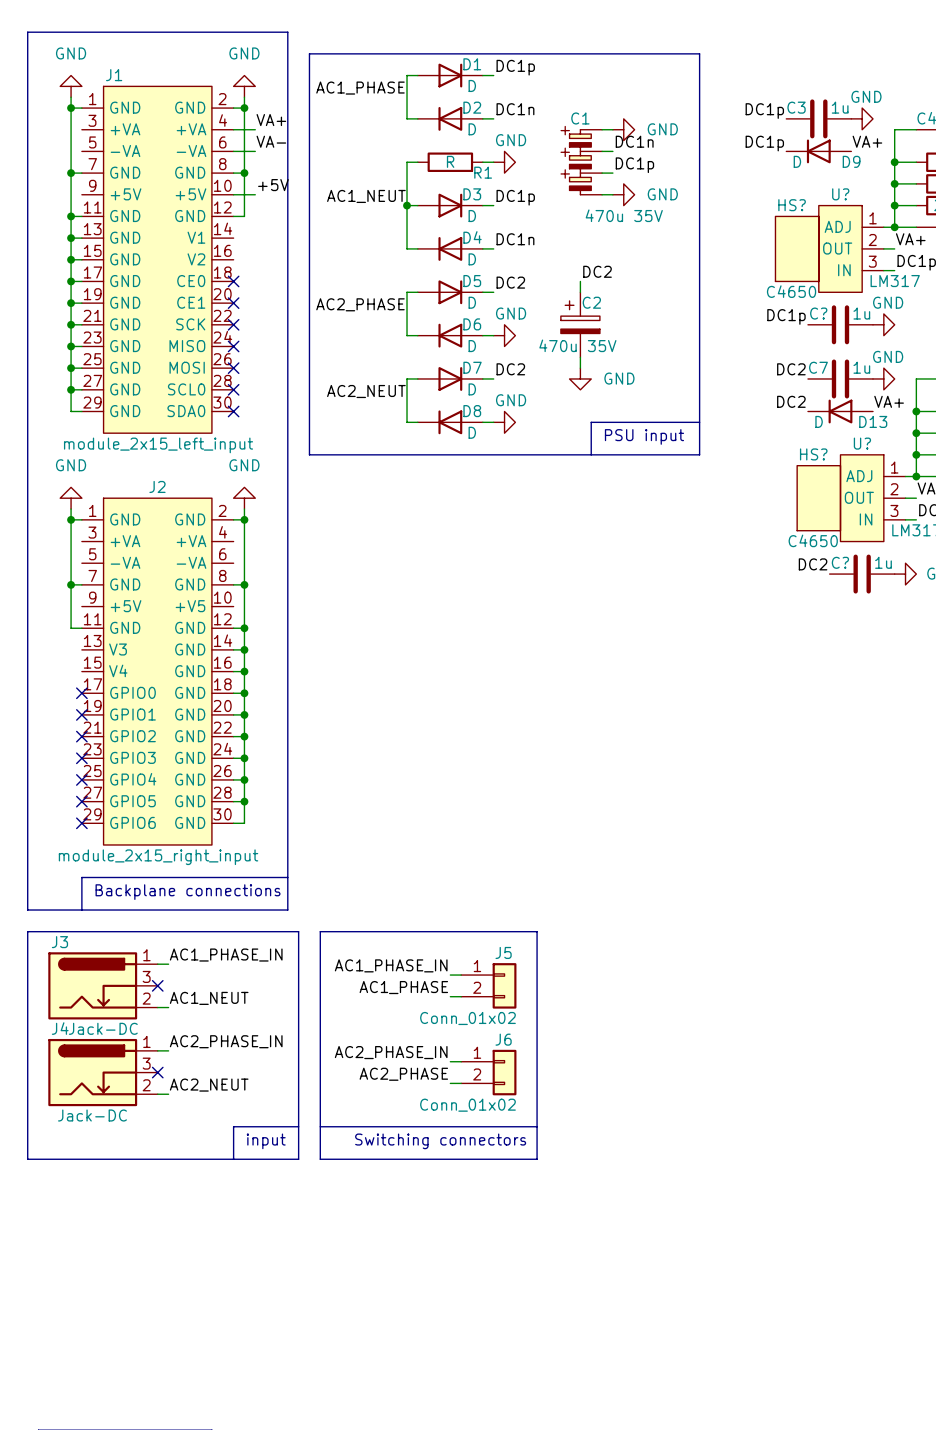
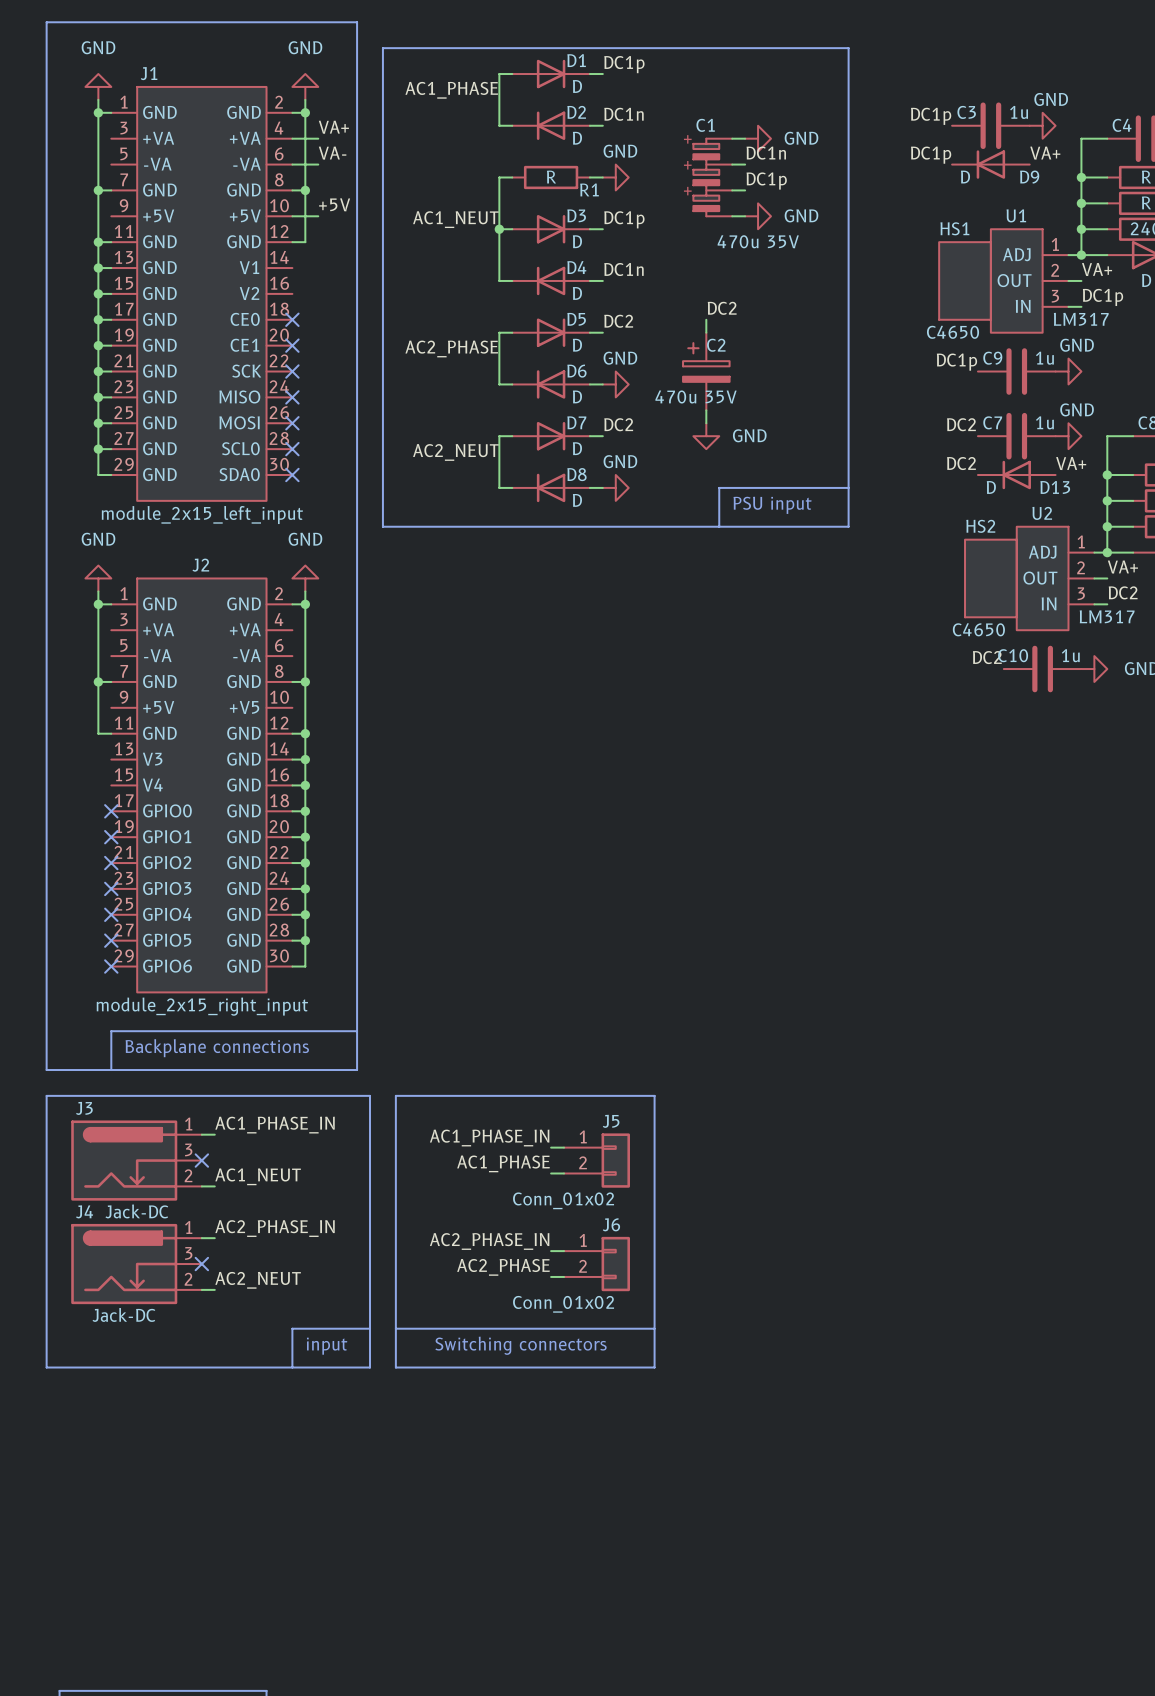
U? name: U? (840, 194) -> U1 (1016, 215)
HS? name: HS? (792, 205) -> HS1 (954, 228)
C? name: C? (818, 313) -> C9 (992, 358)
U? name: U? (862, 443) -> U2 (1042, 513)
HS? name: HS? (813, 454) -> HS2 (980, 526)
C? name: C? (840, 562) -> C10 (1013, 655)

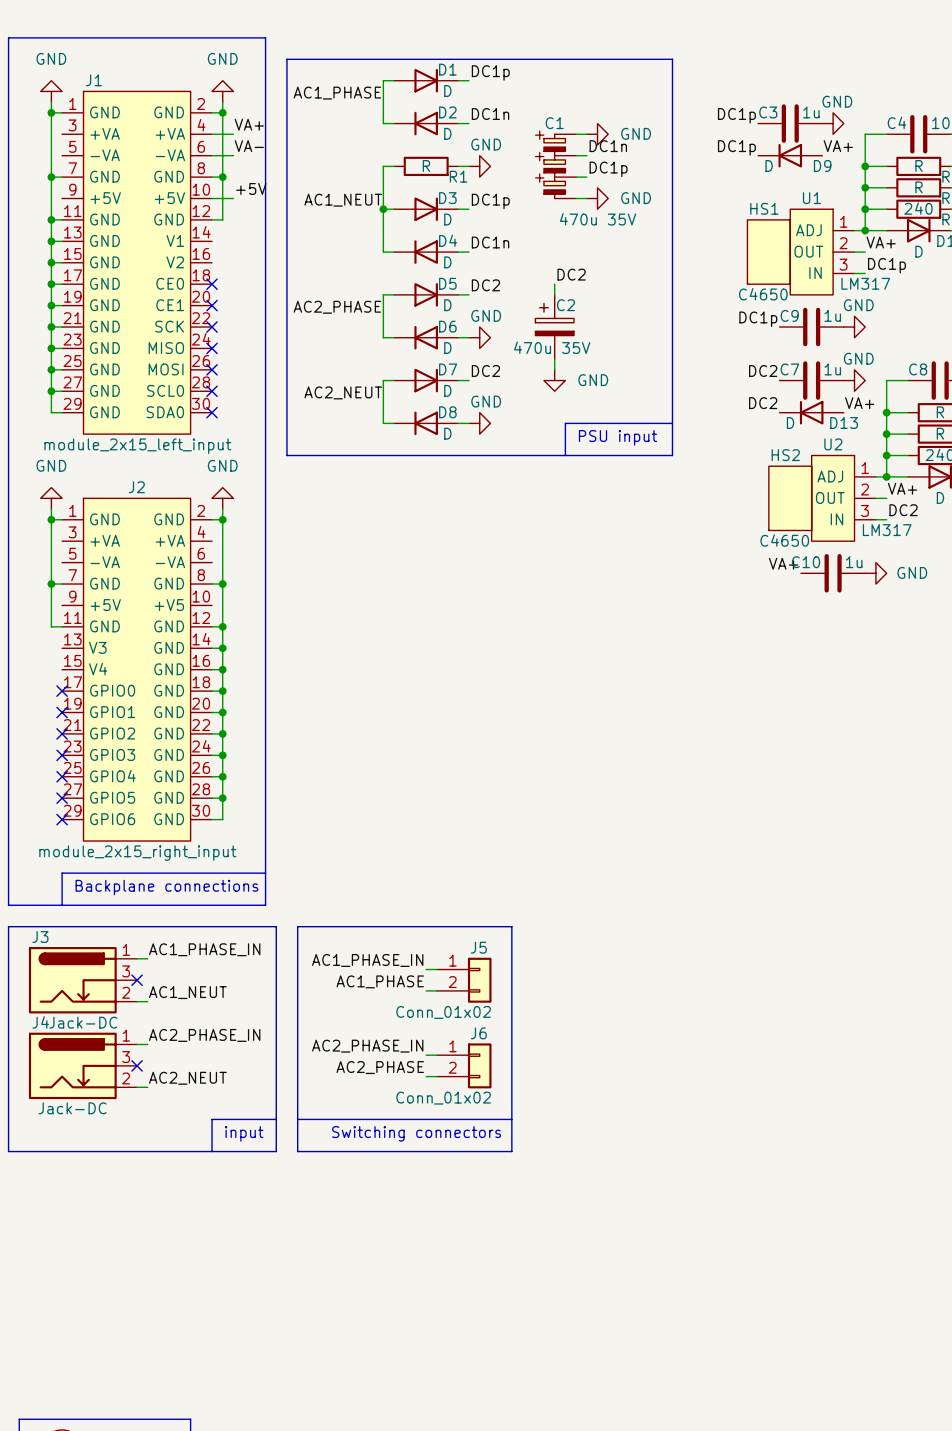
label: DC2 (987, 657) -> VA+ (783, 563)

